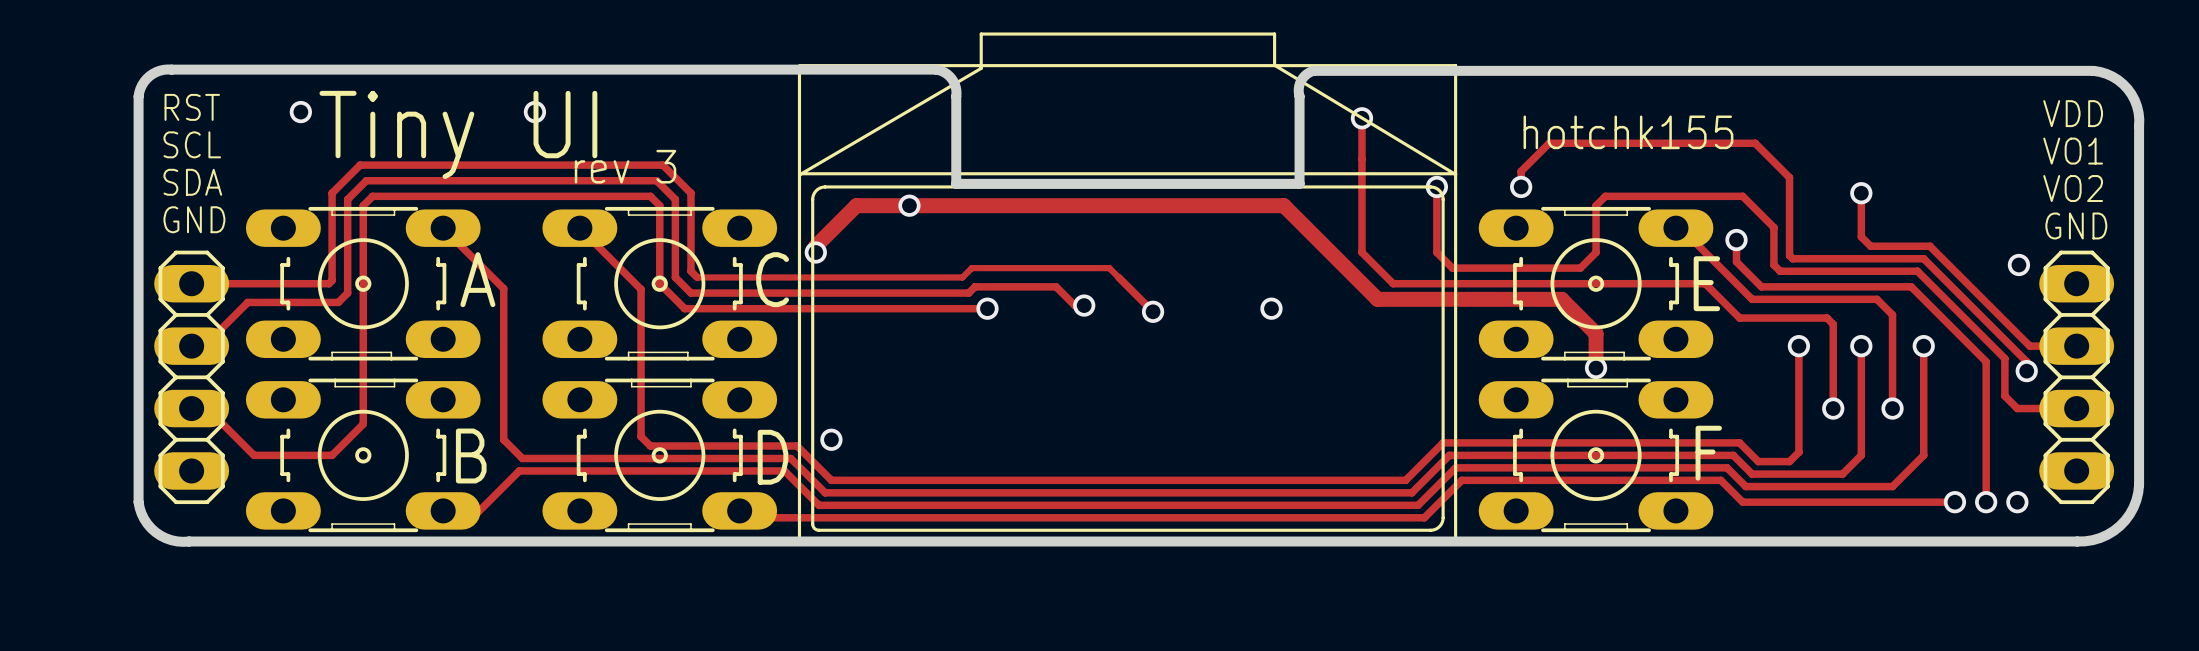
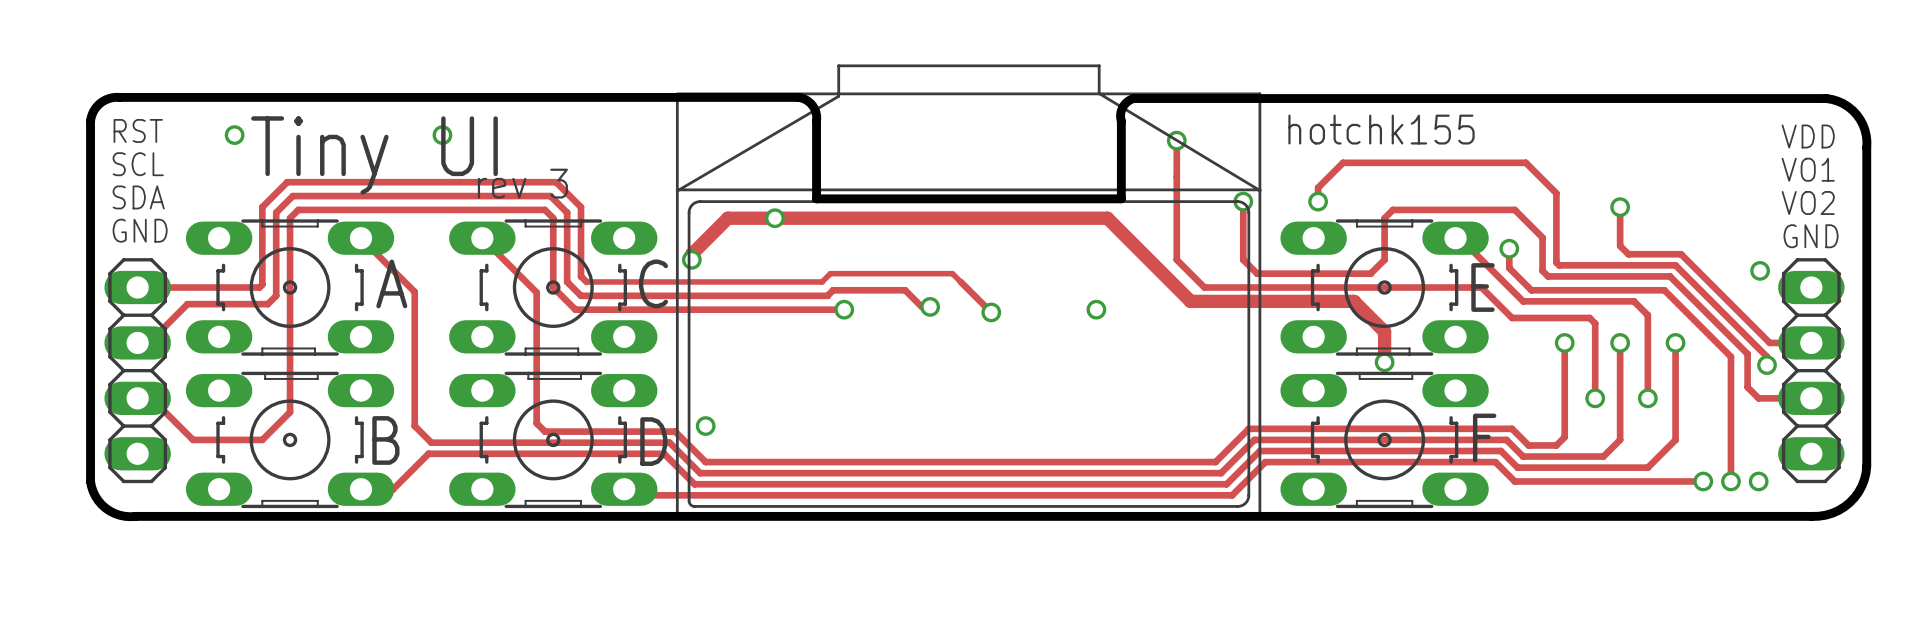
text position: hotchk155 (1628, 132) -> hotchk155 (1381, 129)

